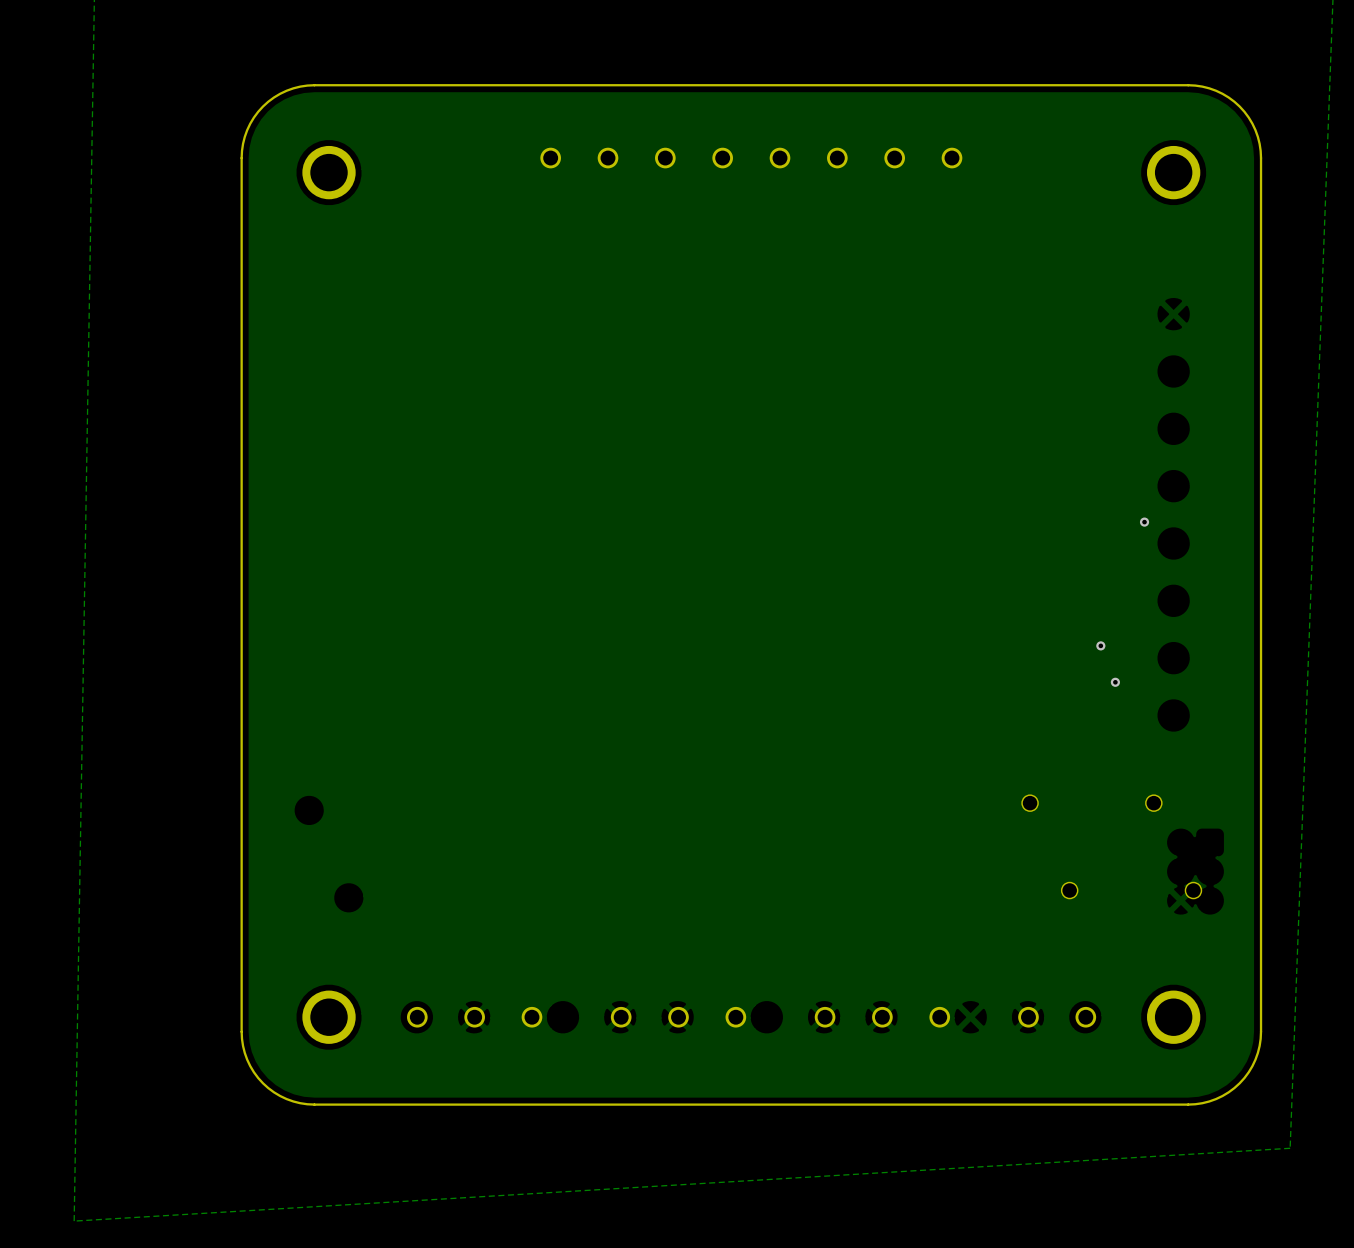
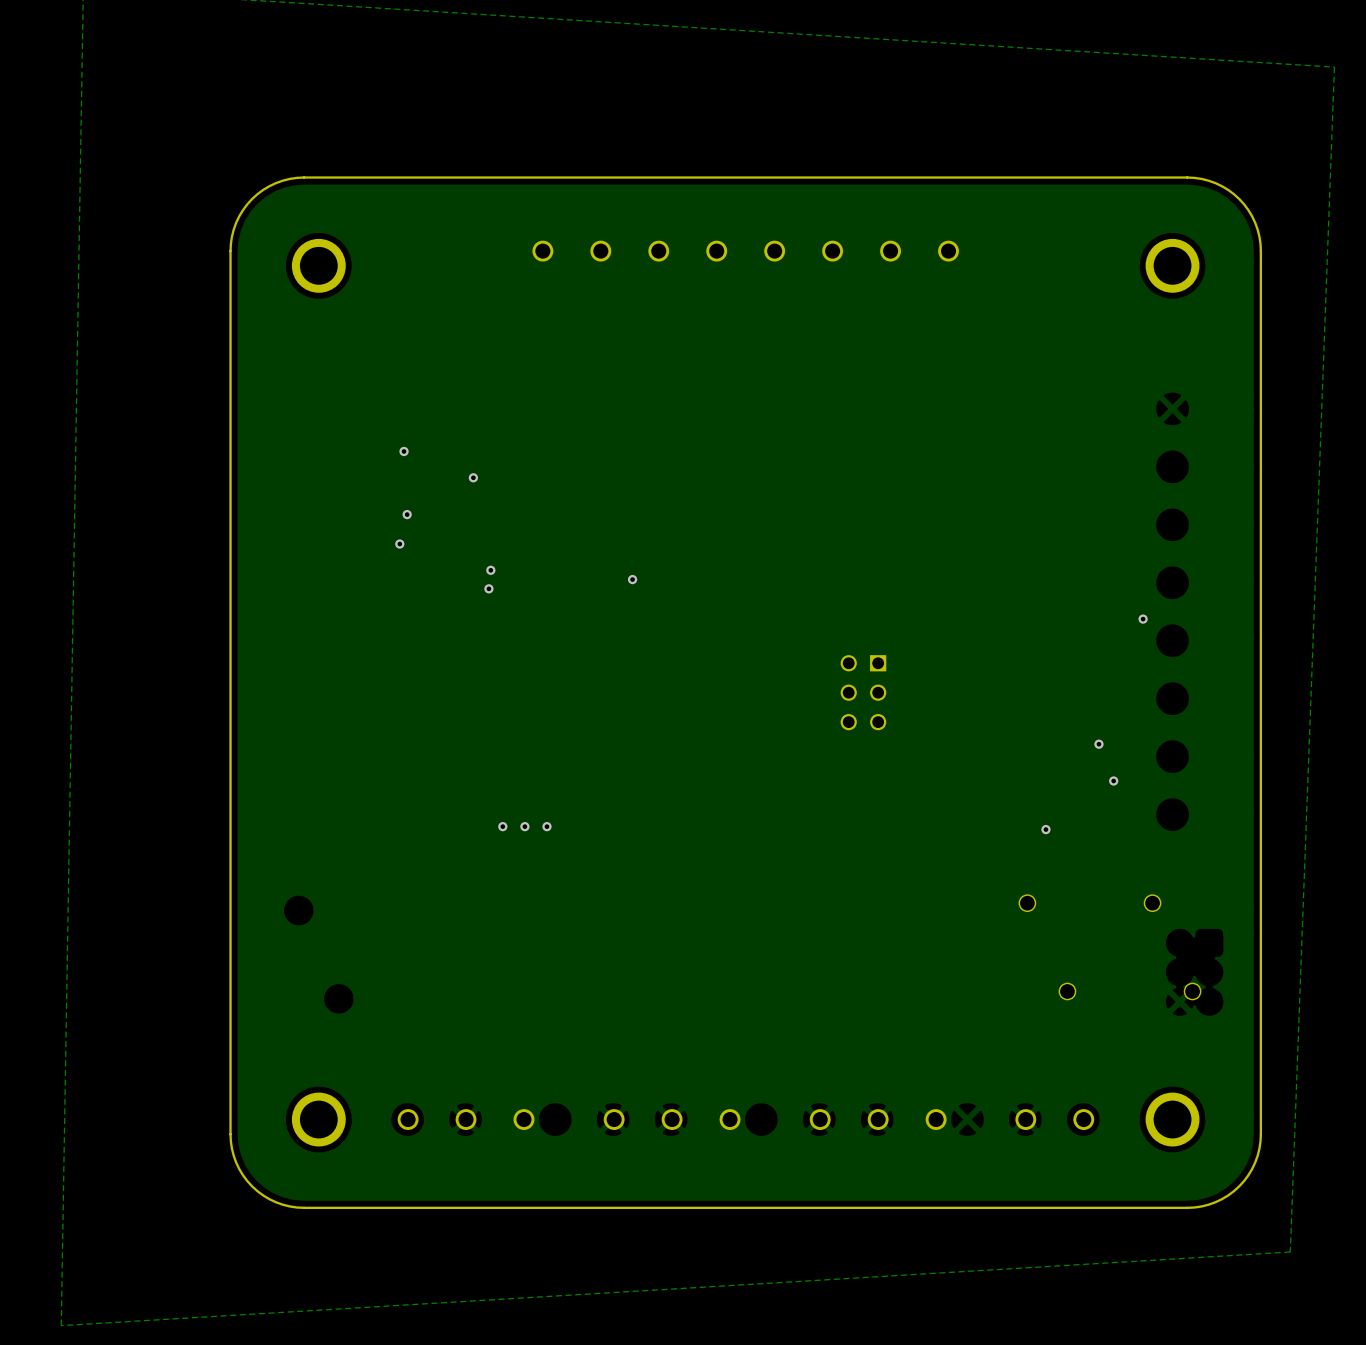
via: none -> (404, 451)
via: none -> (473, 477)
via: none -> (407, 514)
via: none -> (399, 544)
via: none -> (490, 570)
via: none -> (632, 579)
via: none -> (488, 588)
part: none -> (863, 692)
via: none -> (502, 826)
via: none -> (524, 826)
via: none -> (546, 826)
via: none -> (1045, 829)

